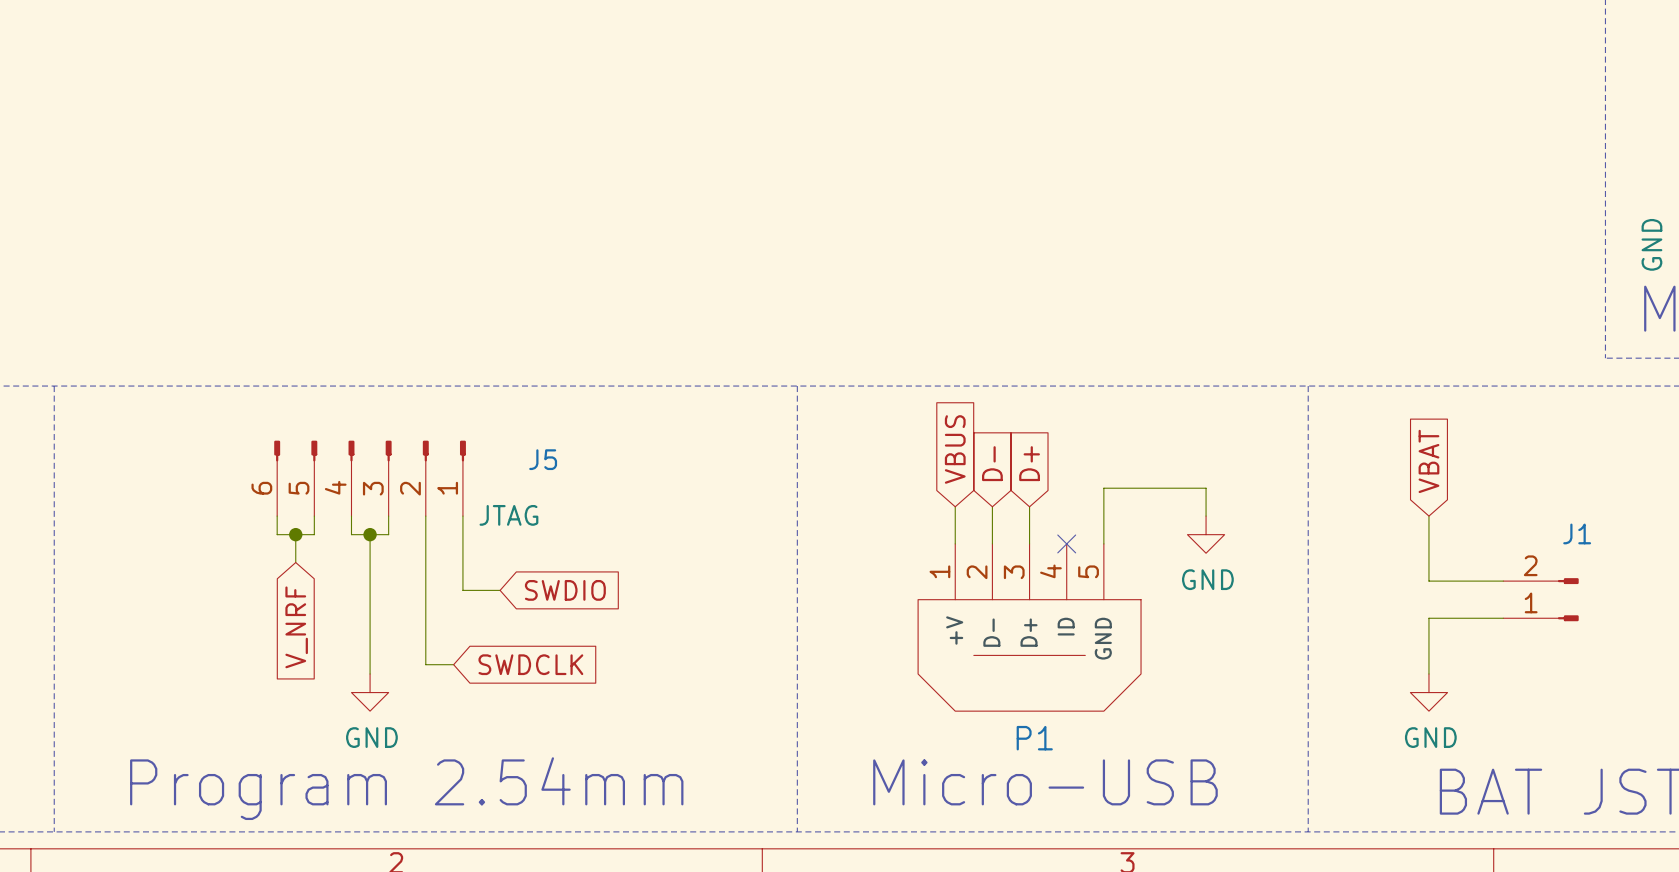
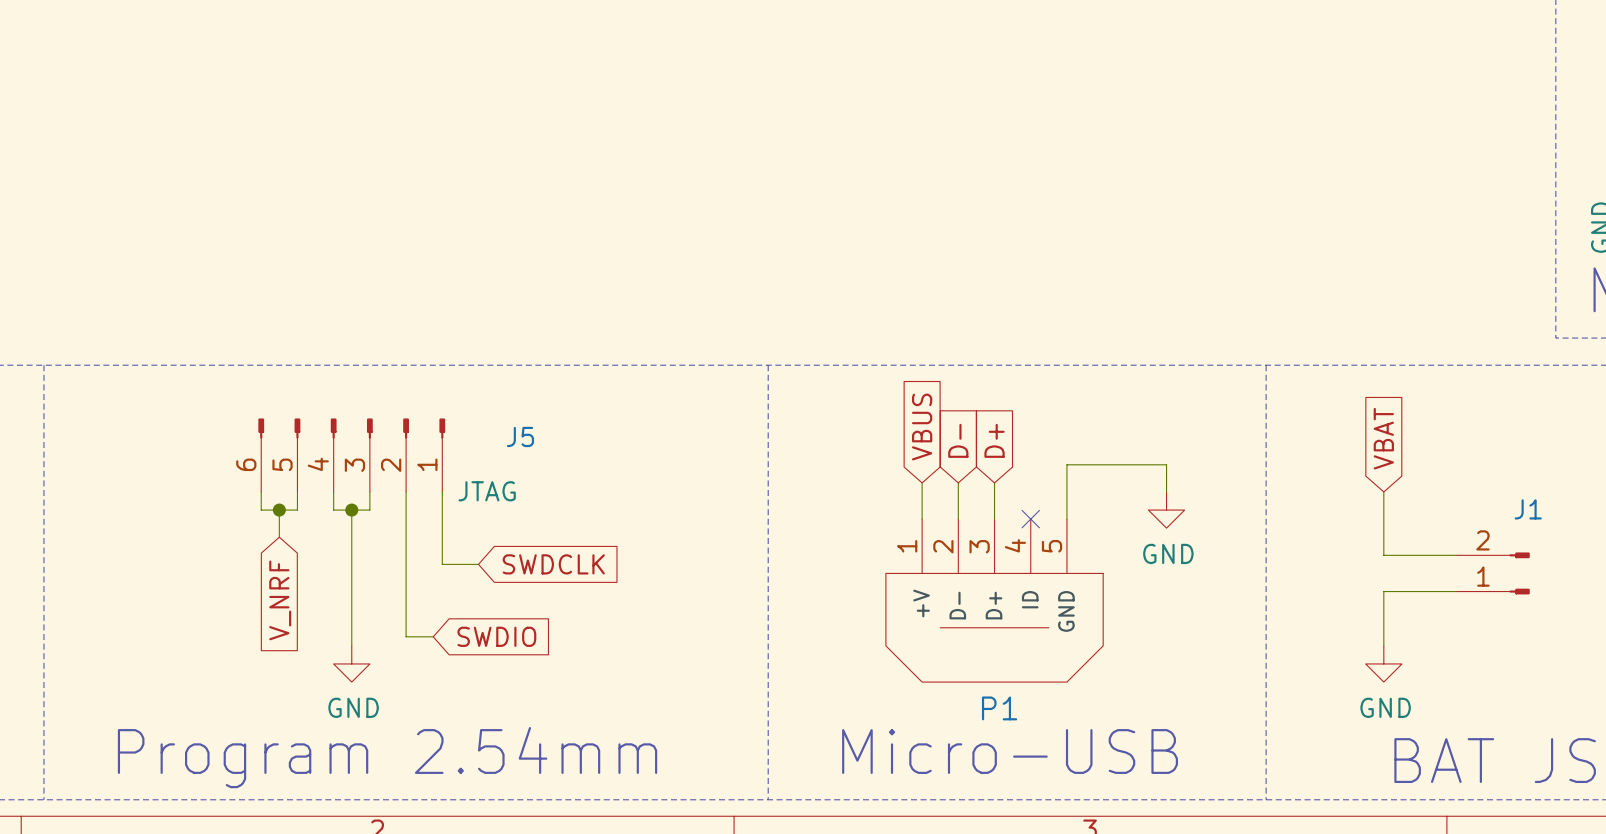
global label: SWDIO (565, 590) -> SWDCLK (553, 564)
global label: SWDCLK (530, 664) -> SWDIO (496, 636)

